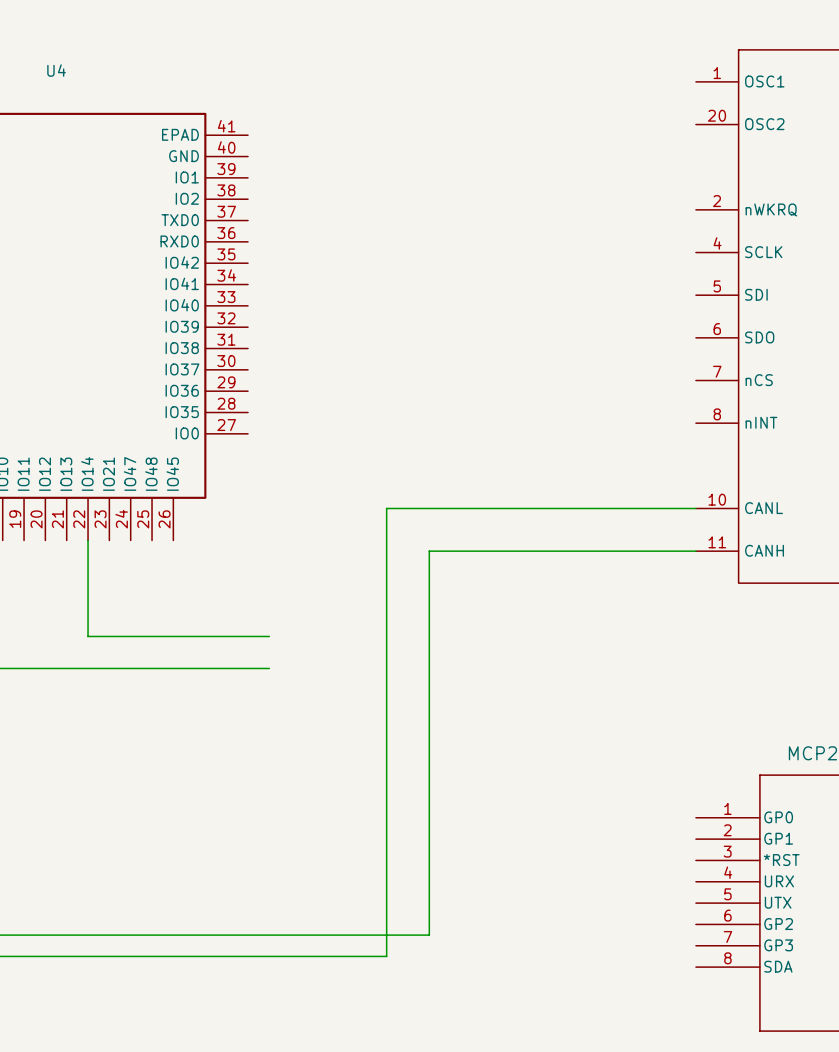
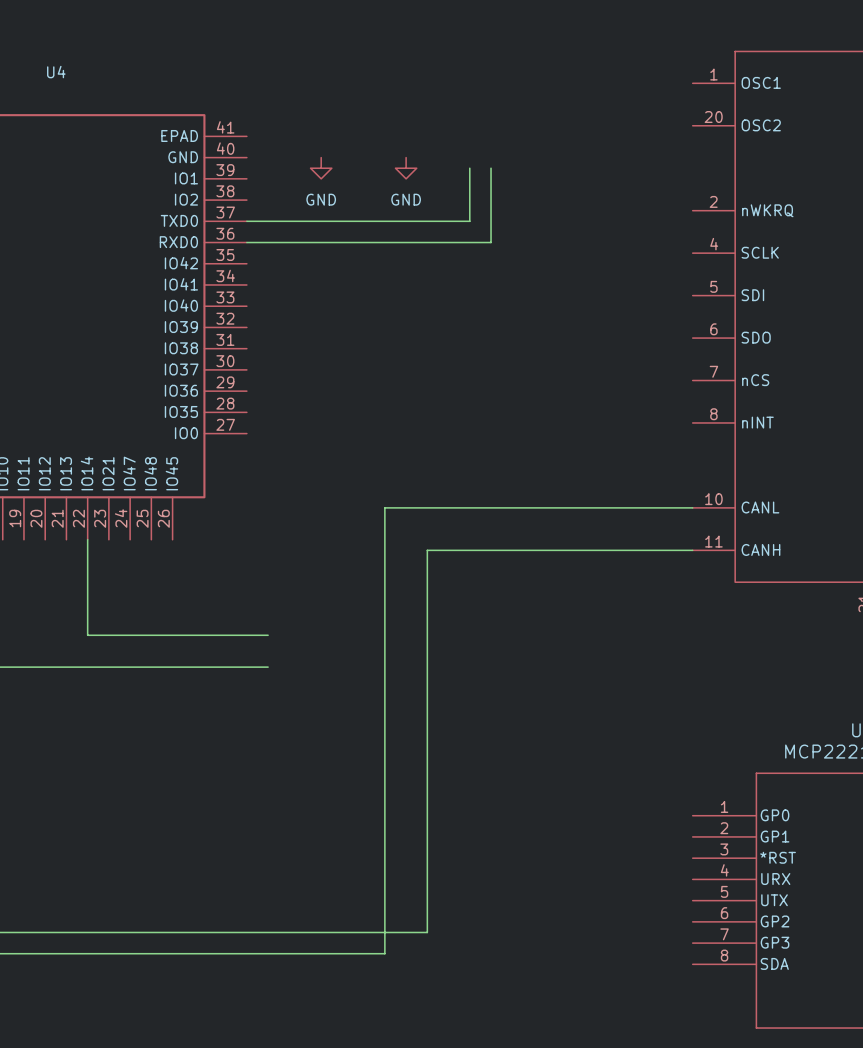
power symbol: none -> GND (321, 168)
power symbol: none -> GND (406, 168)
wire: none -> (469, 168) (469, 221) (246, 221)
wire: none -> (491, 168) (491, 242) (246, 242)

